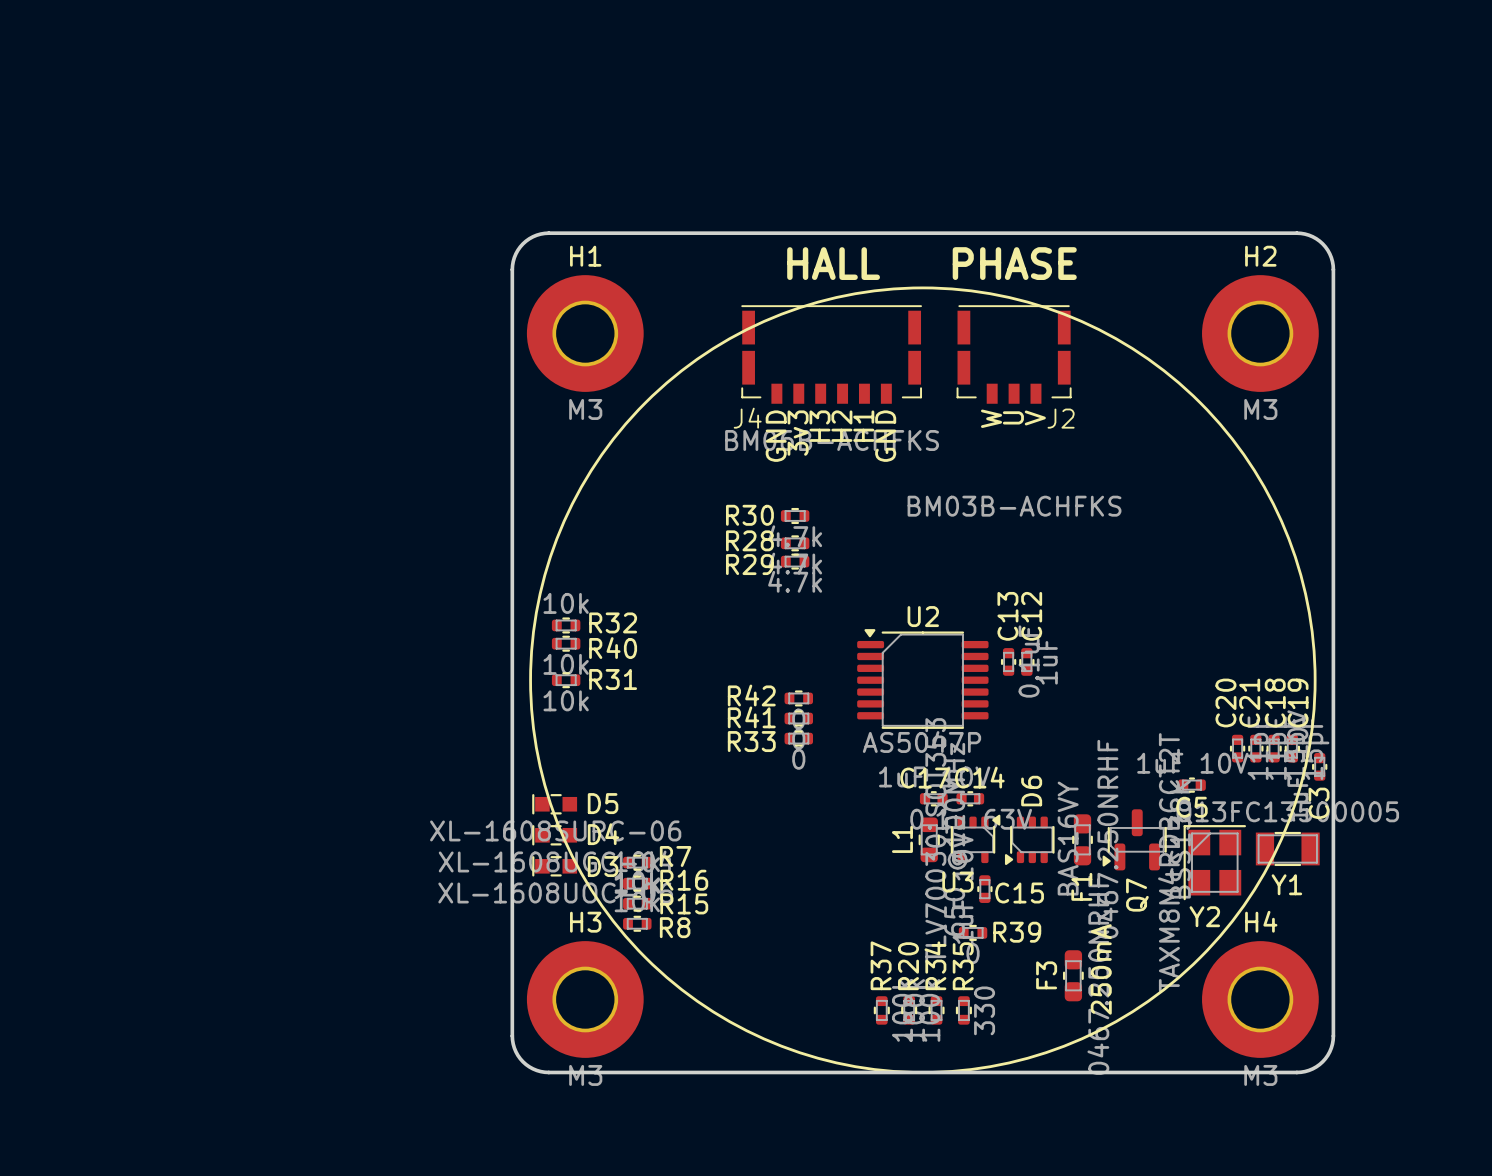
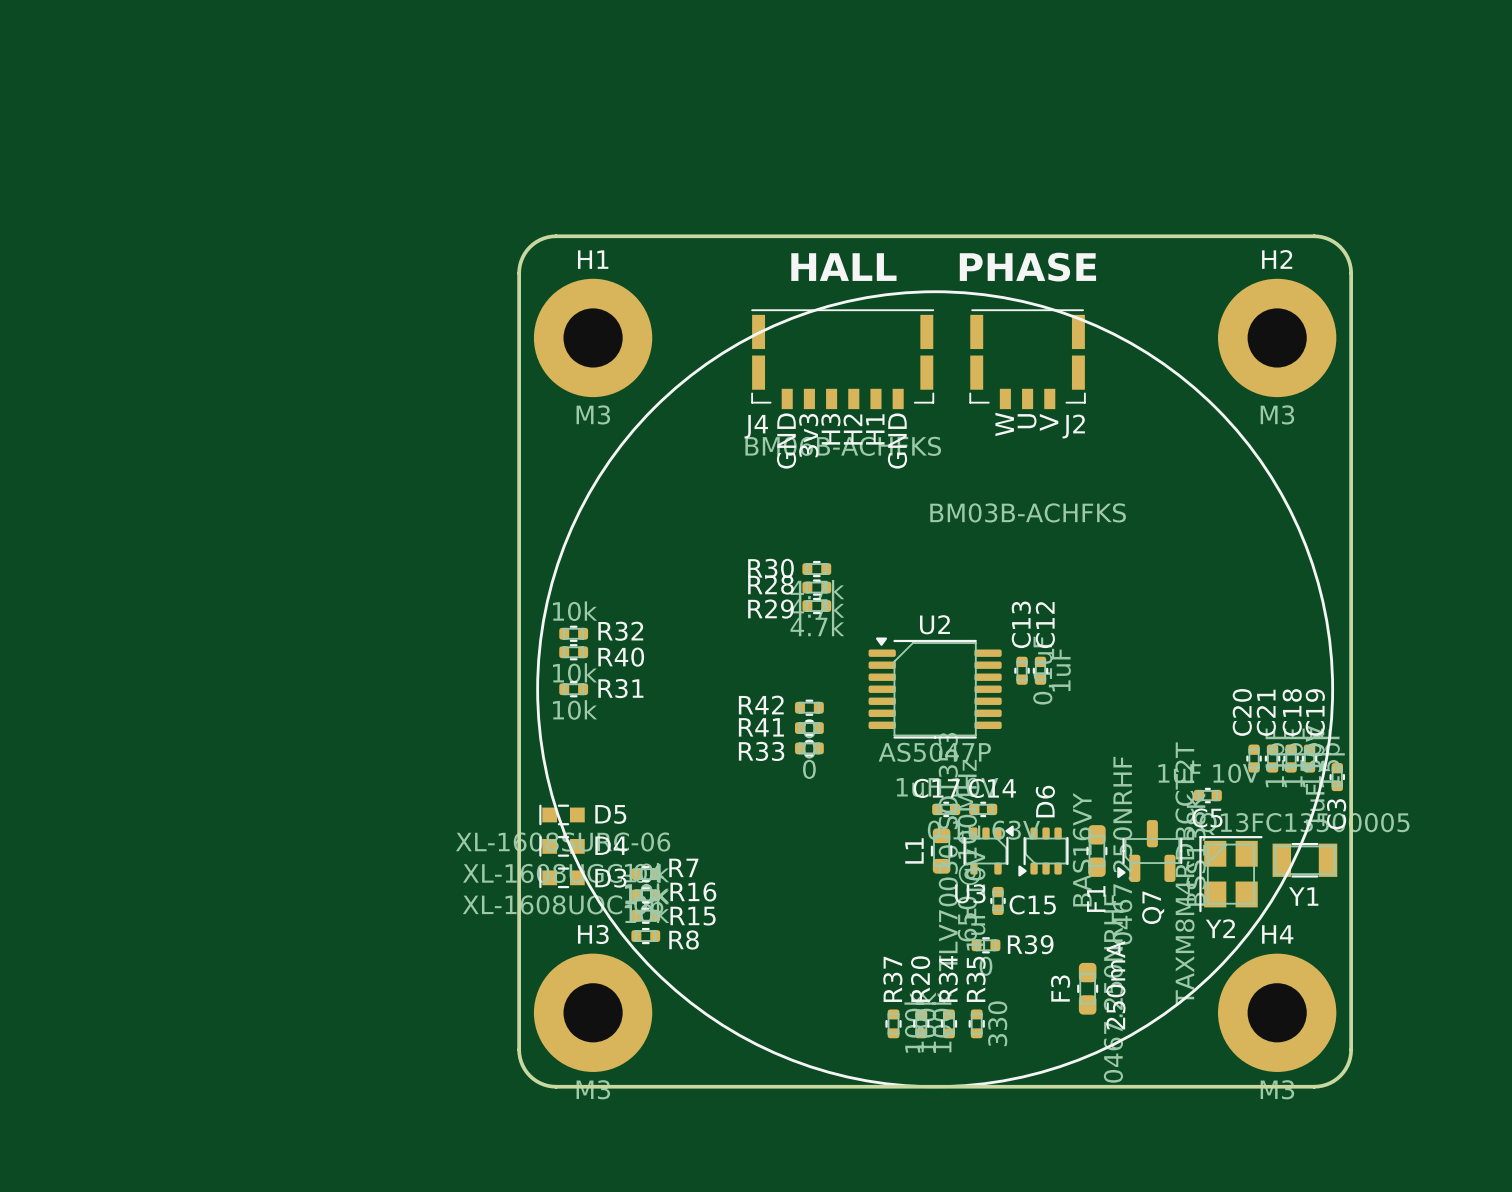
R30 position: (795, 515) -> (816, 569)
R28 position: (795, 543) -> (816, 587)
R29 position: (795, 561) -> (816, 606)

